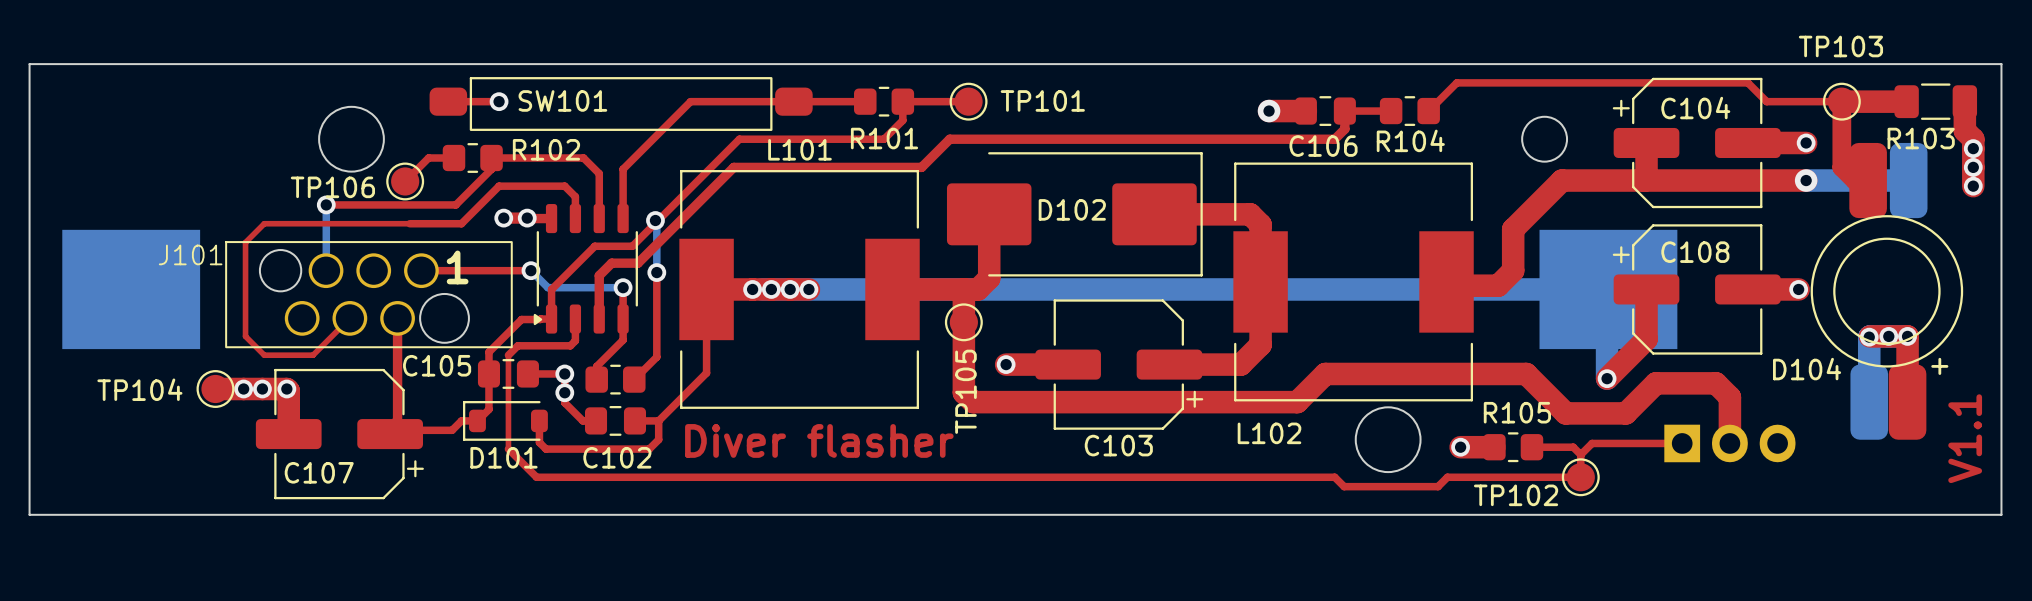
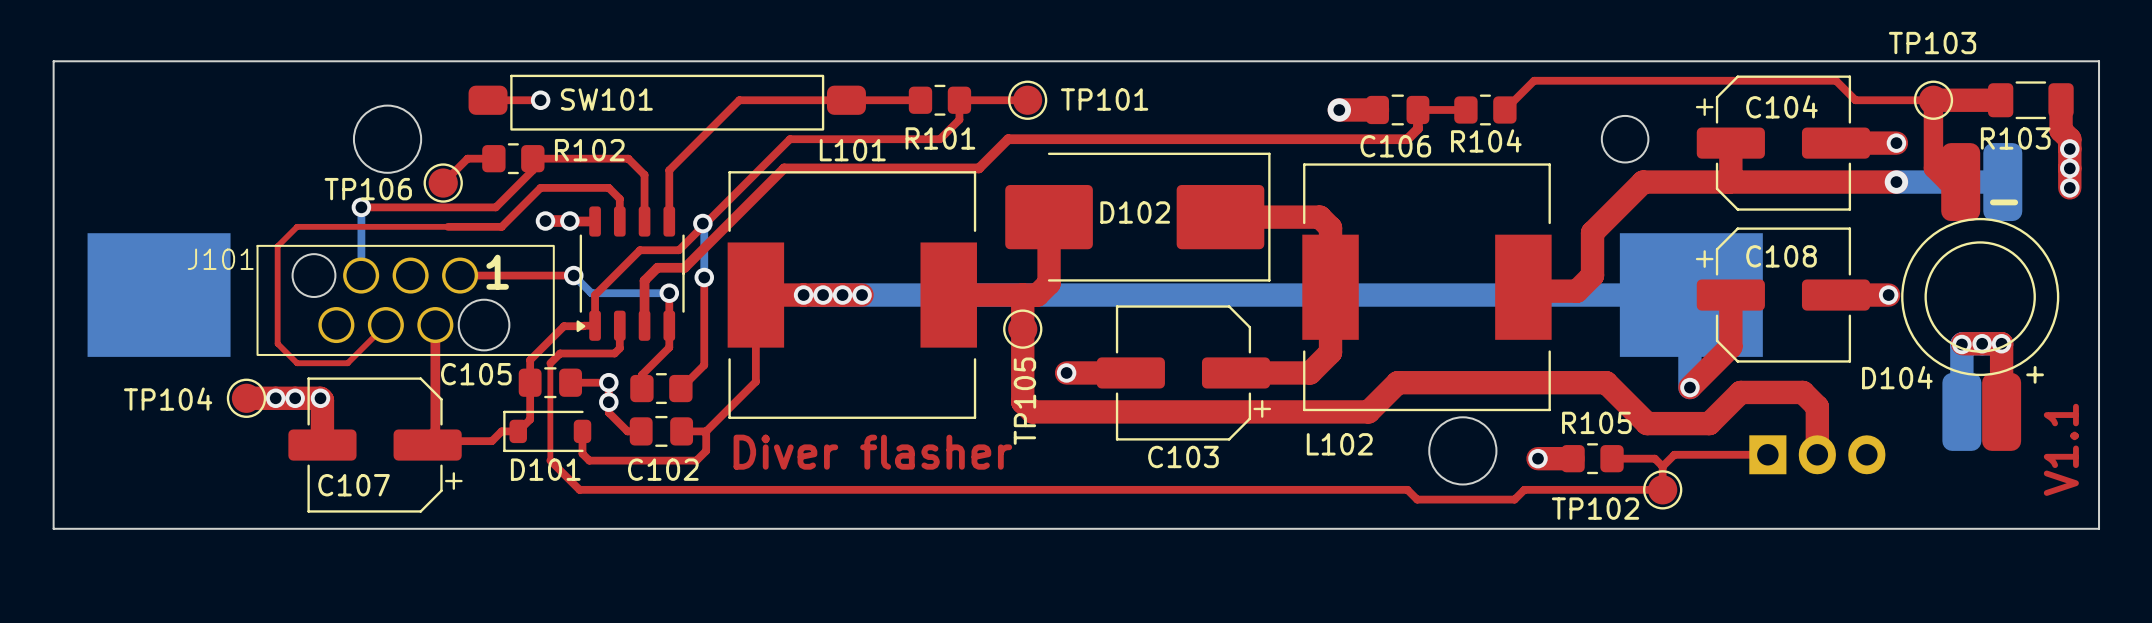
D104 text: none -> - (2004, 202)

